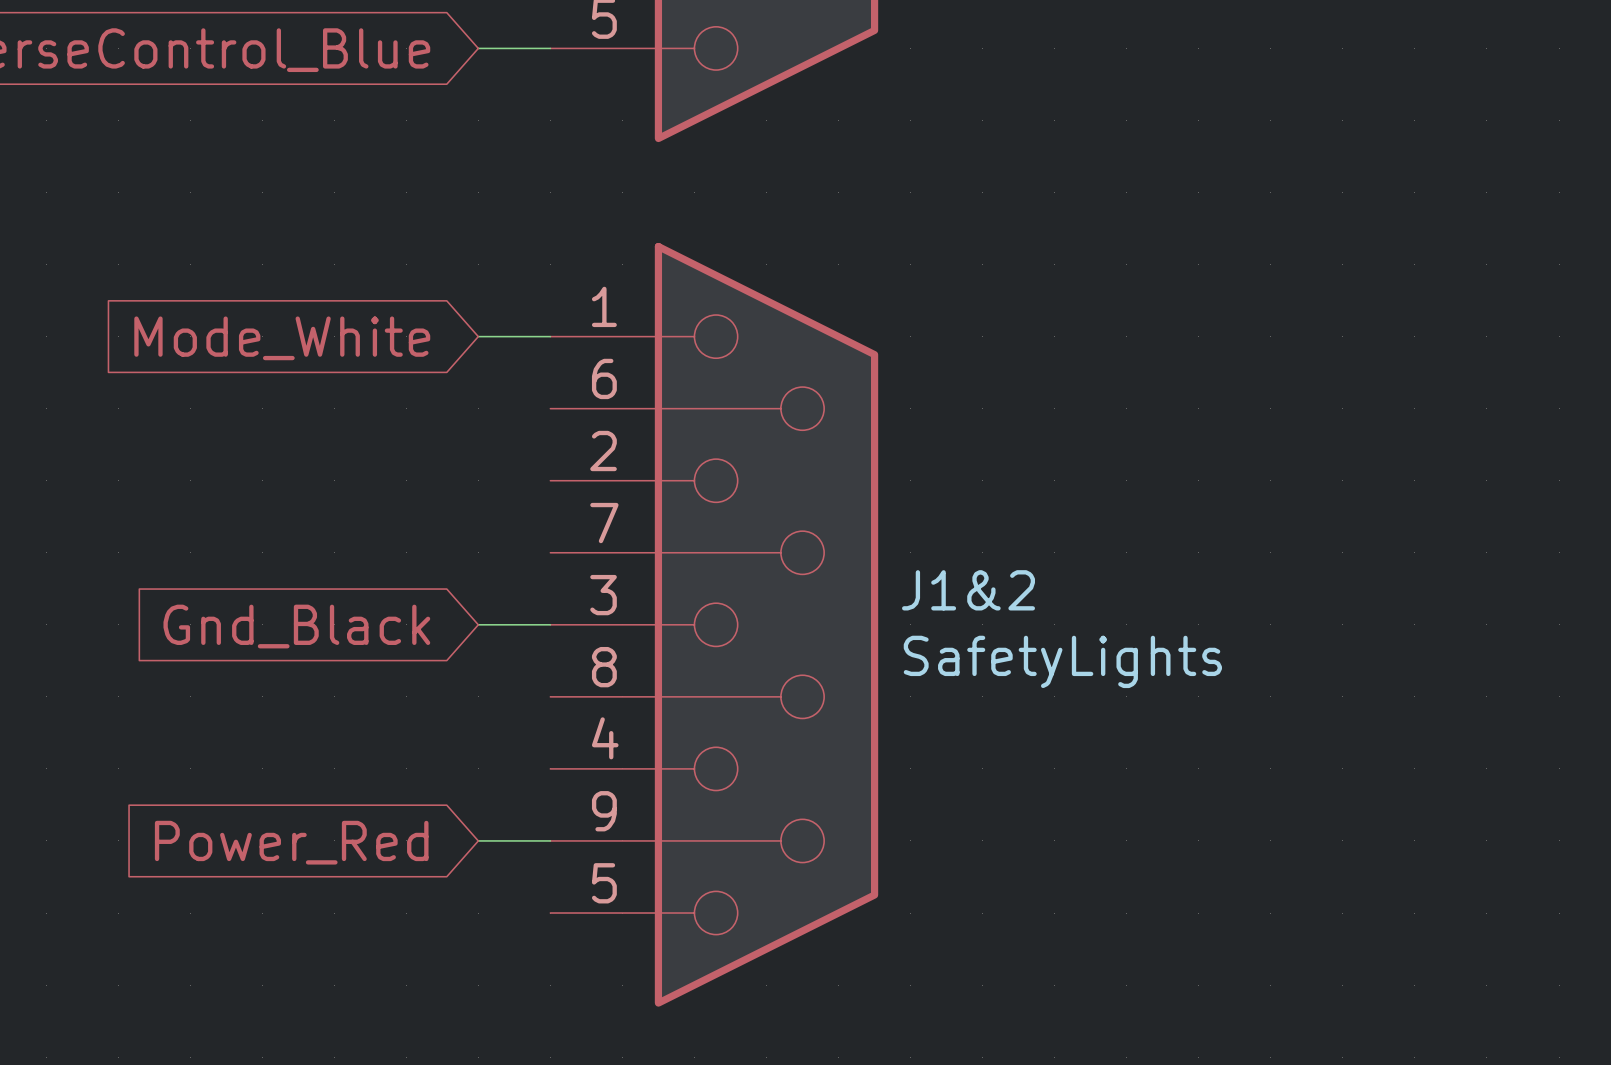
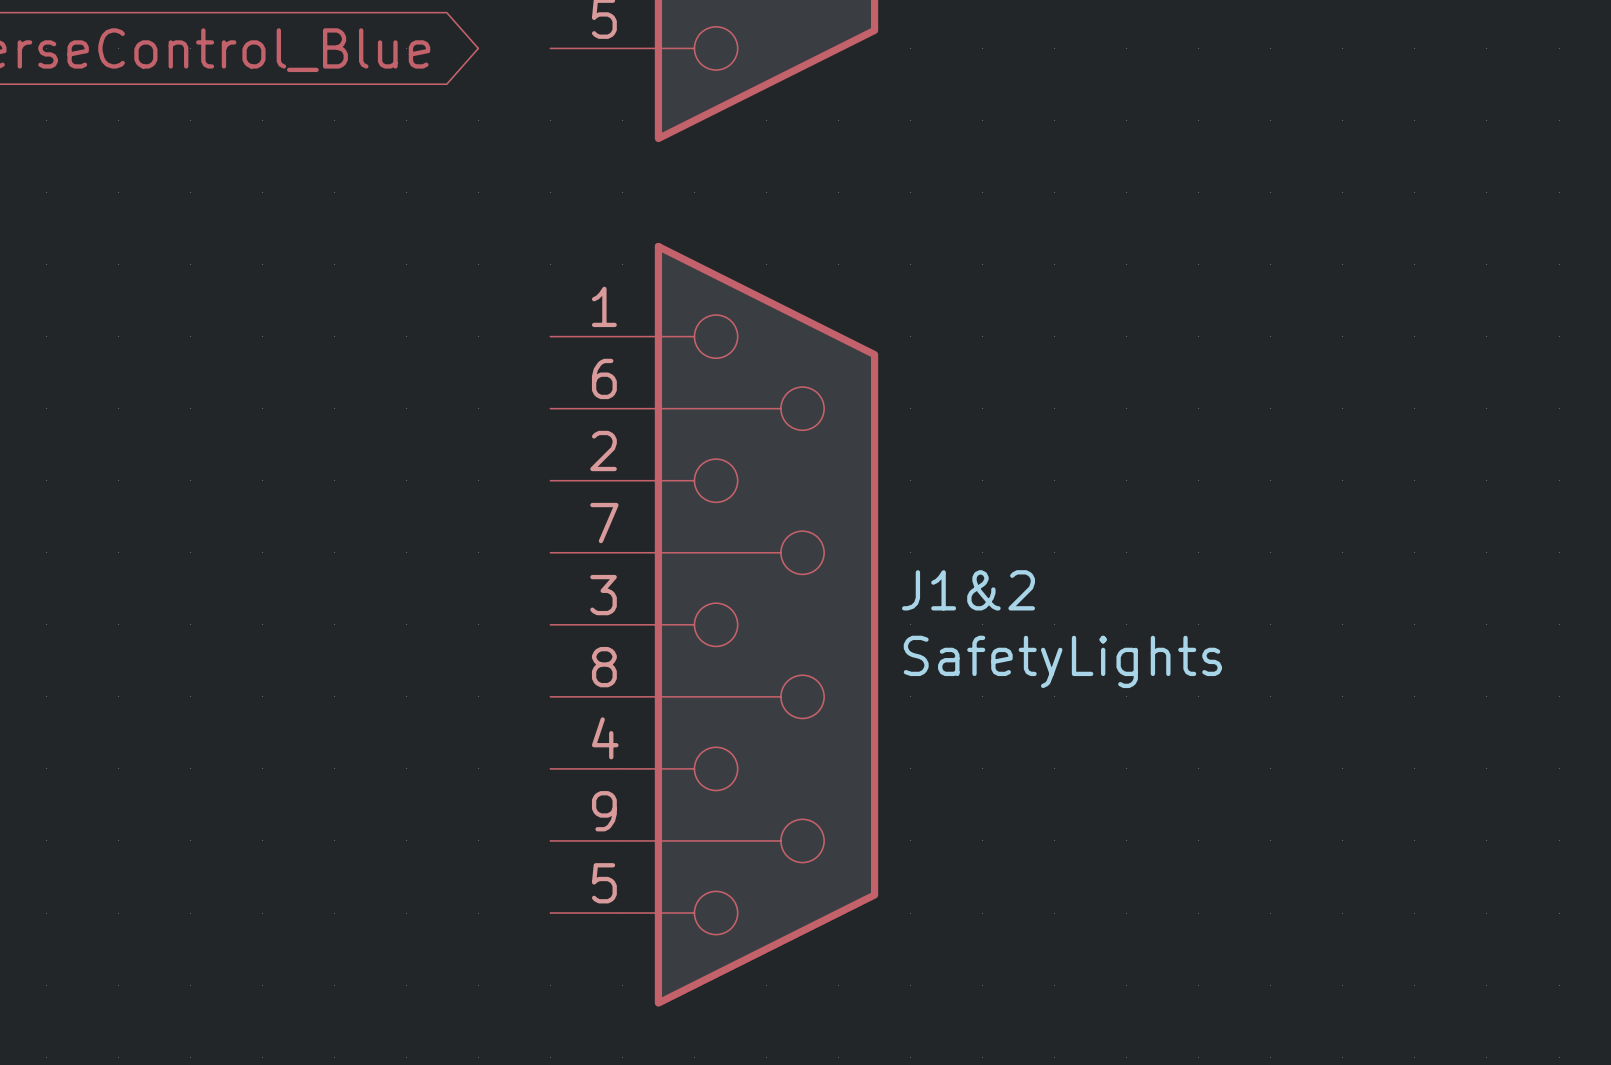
wire: (478, 48) (550, 48) -> none
wire: (478, 336) (550, 336) -> none
global label: Mode_White (282, 338) -> none
wire: (478, 624) (550, 624) -> none
global label: Gnd_Black (296, 626) -> none
wire: (478, 840) (550, 840) -> none
global label: Power_Red (291, 842) -> none

